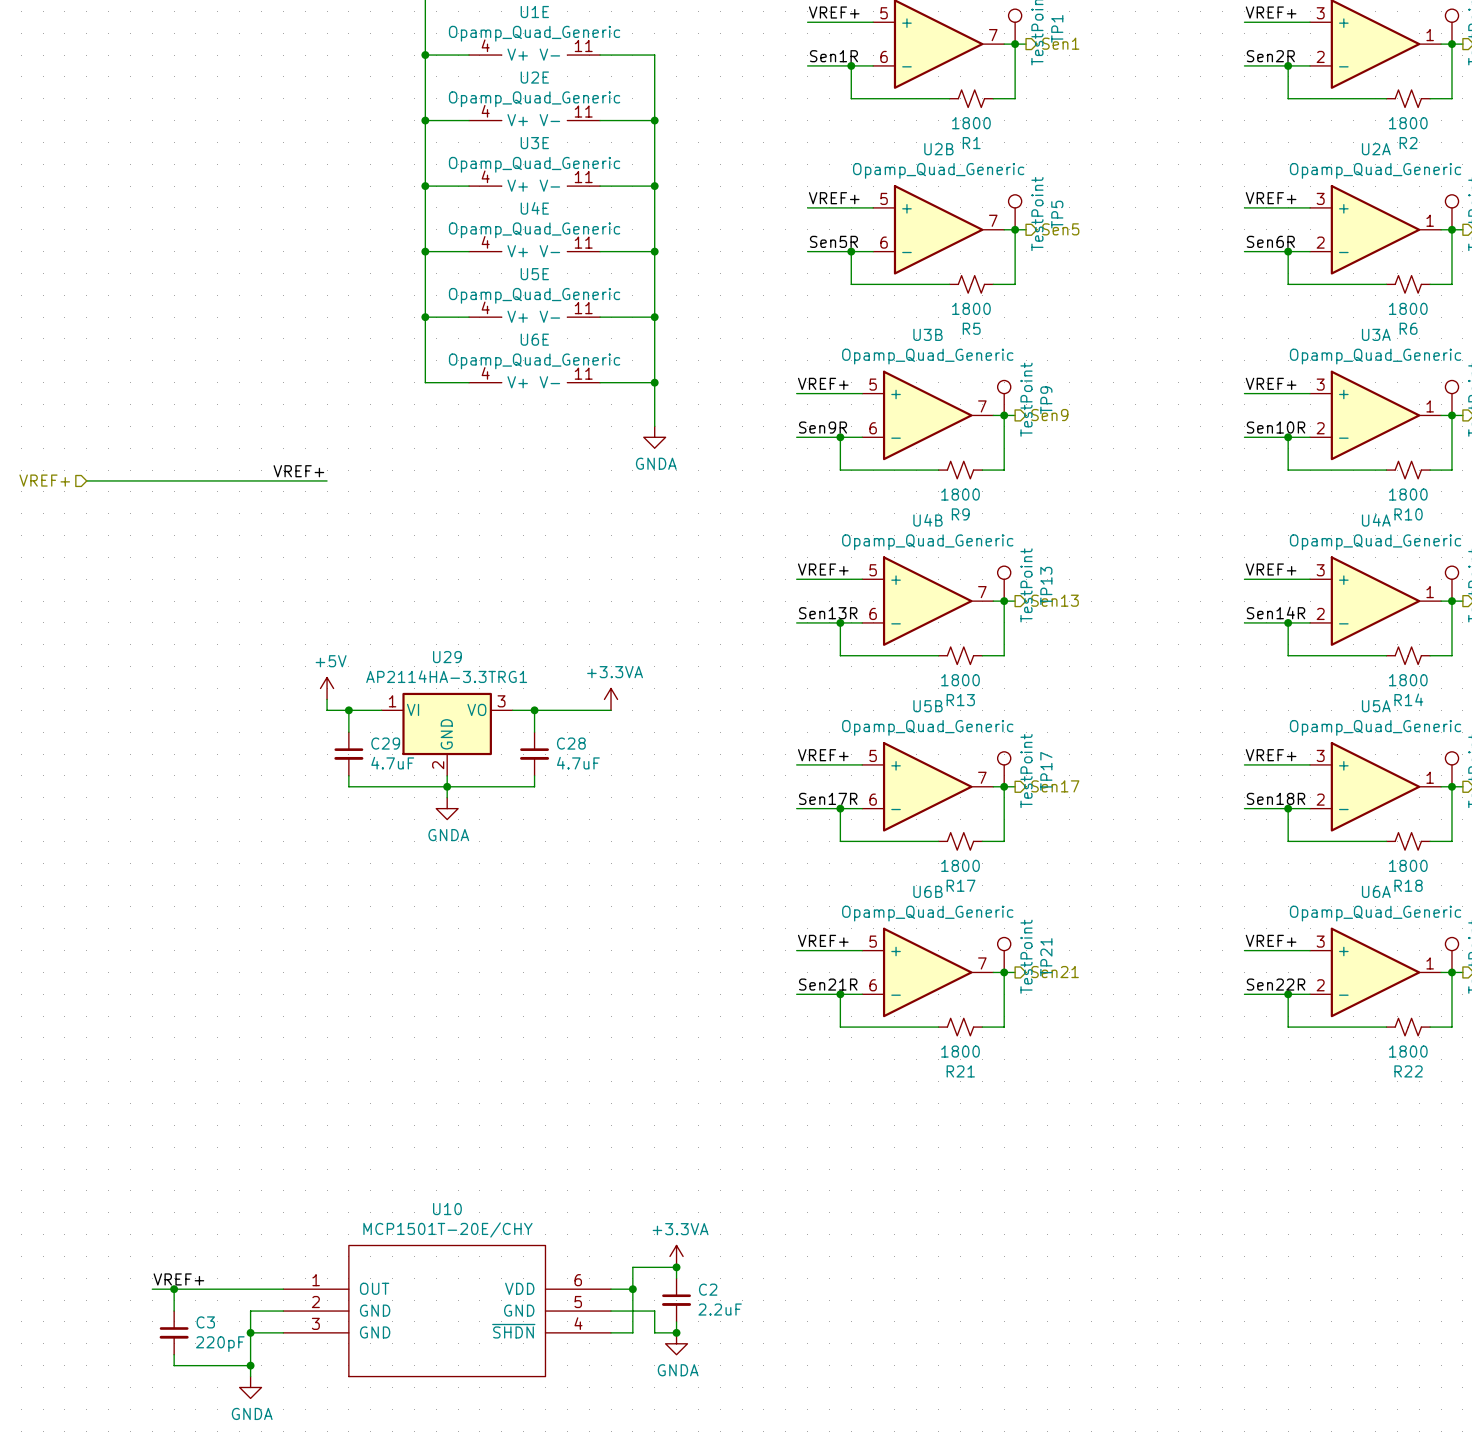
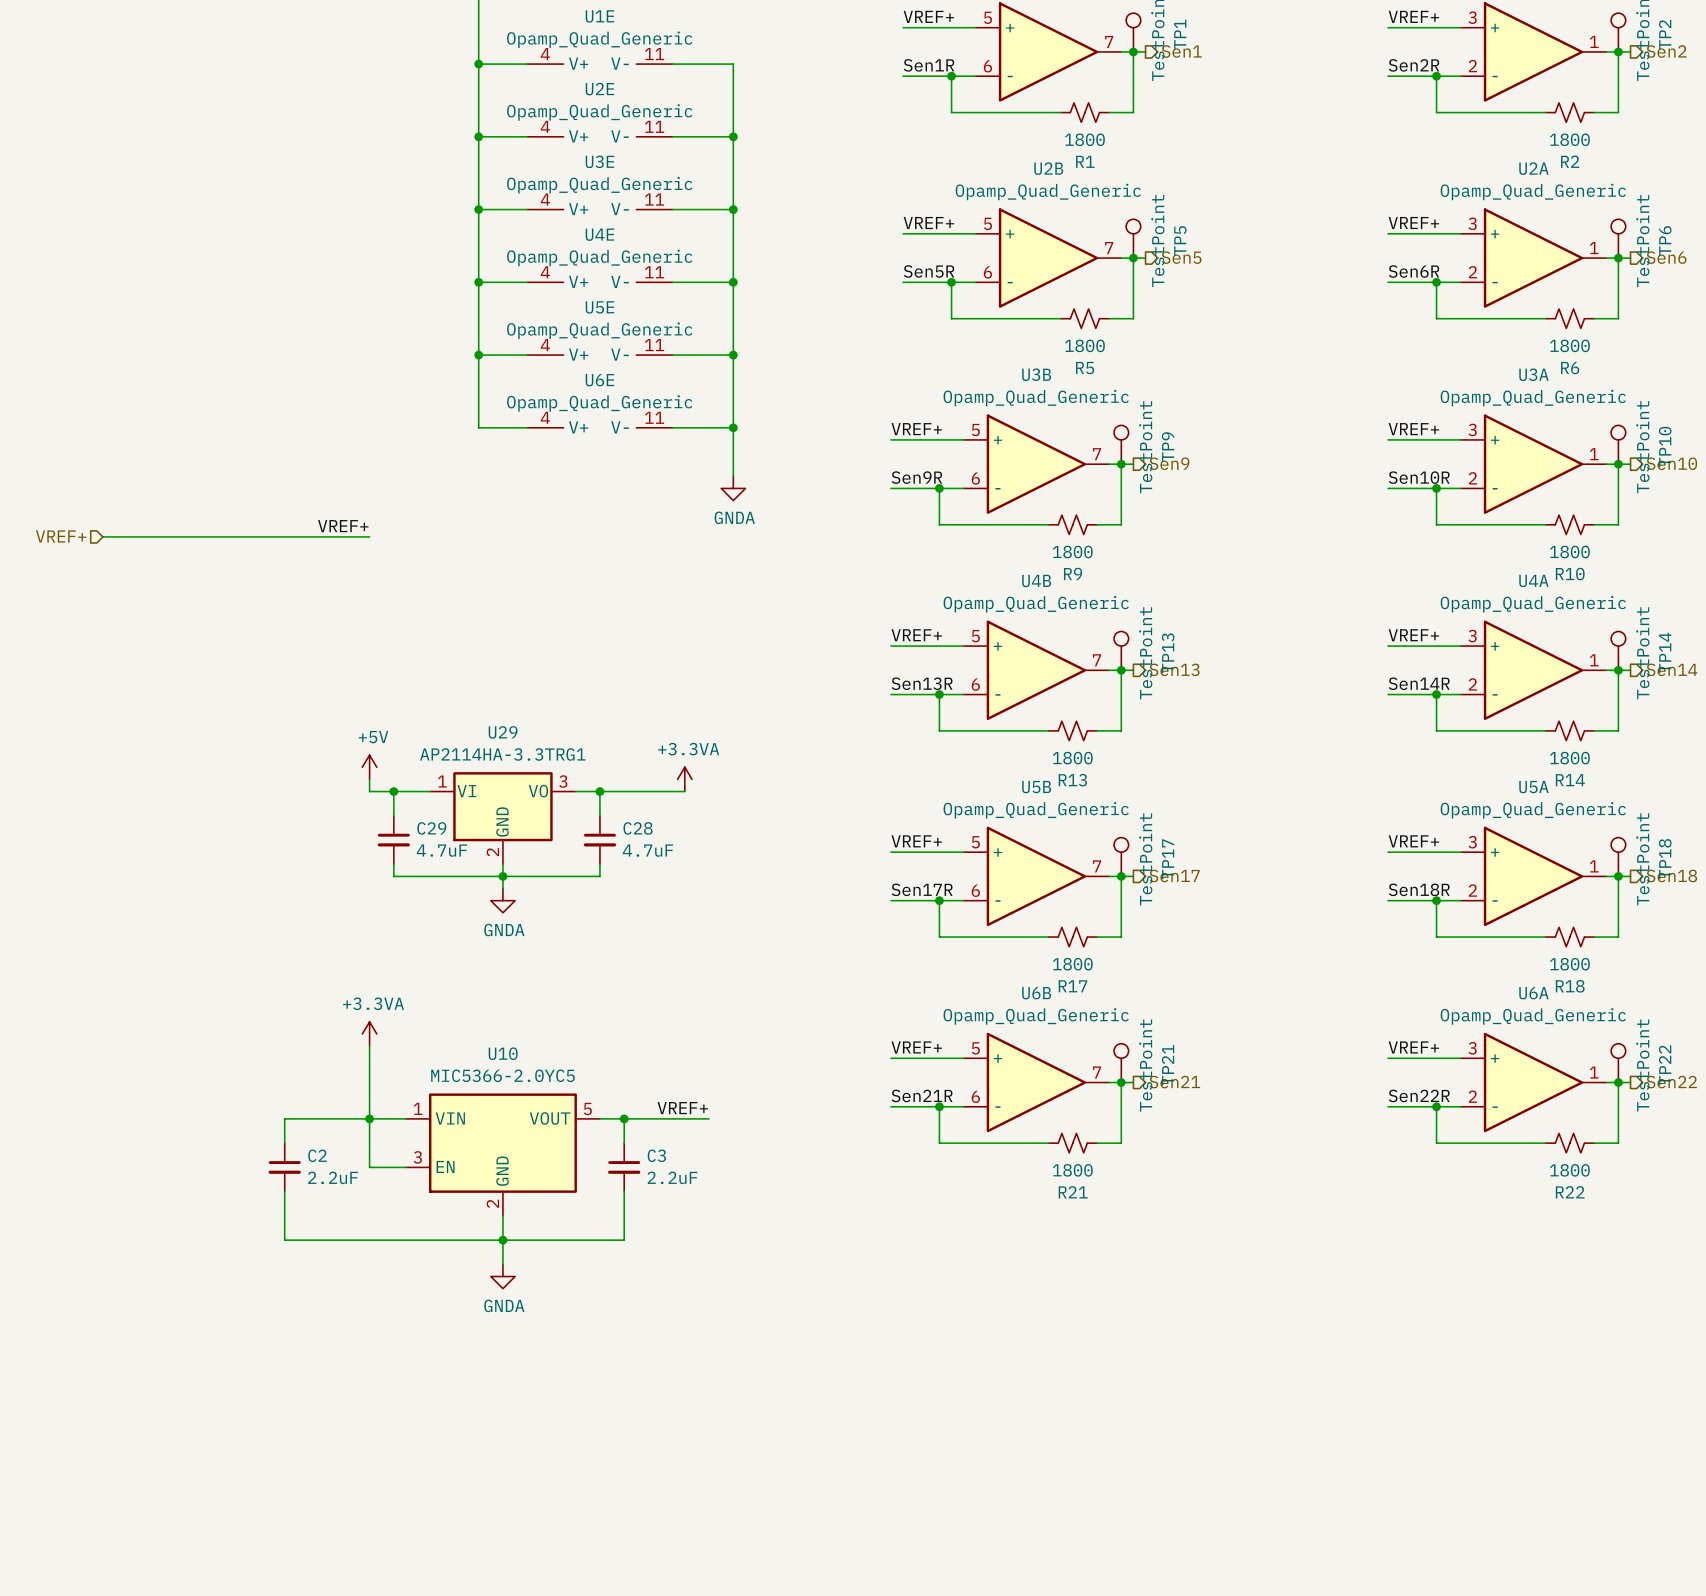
power symbol: none -> +3.3VA (369, 1034)
wire: none -> (369, 1046) (369, 1167) (405, 1167)
label: none -> VREF+ (682, 1108)
junction: none -> (369, 1118)
wire: none -> (405, 1118) (284, 1118) (284, 1143)
wire: none -> (599, 1118) (709, 1118)
wire: none -> (624, 1118) (624, 1143)
junction: none -> (624, 1118)
wire: none -> (284, 1191) (284, 1240) (624, 1240) (624, 1191)
wire: none -> (502, 1215) (502, 1264)
junction: none -> (502, 1240)
power symbol: none -> GNDA (502, 1276)
U10 value: MCP1501T-20E/CHY (447, 1229) -> MIC5366-2.0YC5 (502, 1075)
U10 symbol: [283, 1245, 612, 1377] -> [405, 1093, 600, 1216]
power symbol: +3.3VA (676, 1256) -> none
junction: (676, 1267) -> none
wire: (676, 1278) (676, 1267) (632, 1267) (632, 1332) (611, 1332) -> none
label: VREF+ (178, 1279) -> none
wire: (152, 1289) (283, 1289) -> none
wire: (174, 1289) (174, 1311) -> none
junction: (174, 1289) -> none
wire: (611, 1289) (632, 1289) -> none
junction: (632, 1289) -> none
C2 position: (676, 1300) -> (284, 1167)
wire: (283, 1311) (250, 1311) (250, 1376) -> none
wire: (611, 1311) (654, 1311) (654, 1332) (676, 1332) (676, 1321) -> none
C3 position: (174, 1332) -> (624, 1167)
wire: (250, 1332) (283, 1332) -> none
junction: (250, 1332) -> none
junction: (676, 1332) -> none
power symbol: GNDA (676, 1343) -> none
C3 value: 220pF (220, 1344) -> 2.2uF (672, 1177)
wire: (174, 1354) (174, 1365) (250, 1365) -> none
junction: (250, 1365) -> none
power symbol: GNDA (250, 1387) -> none

